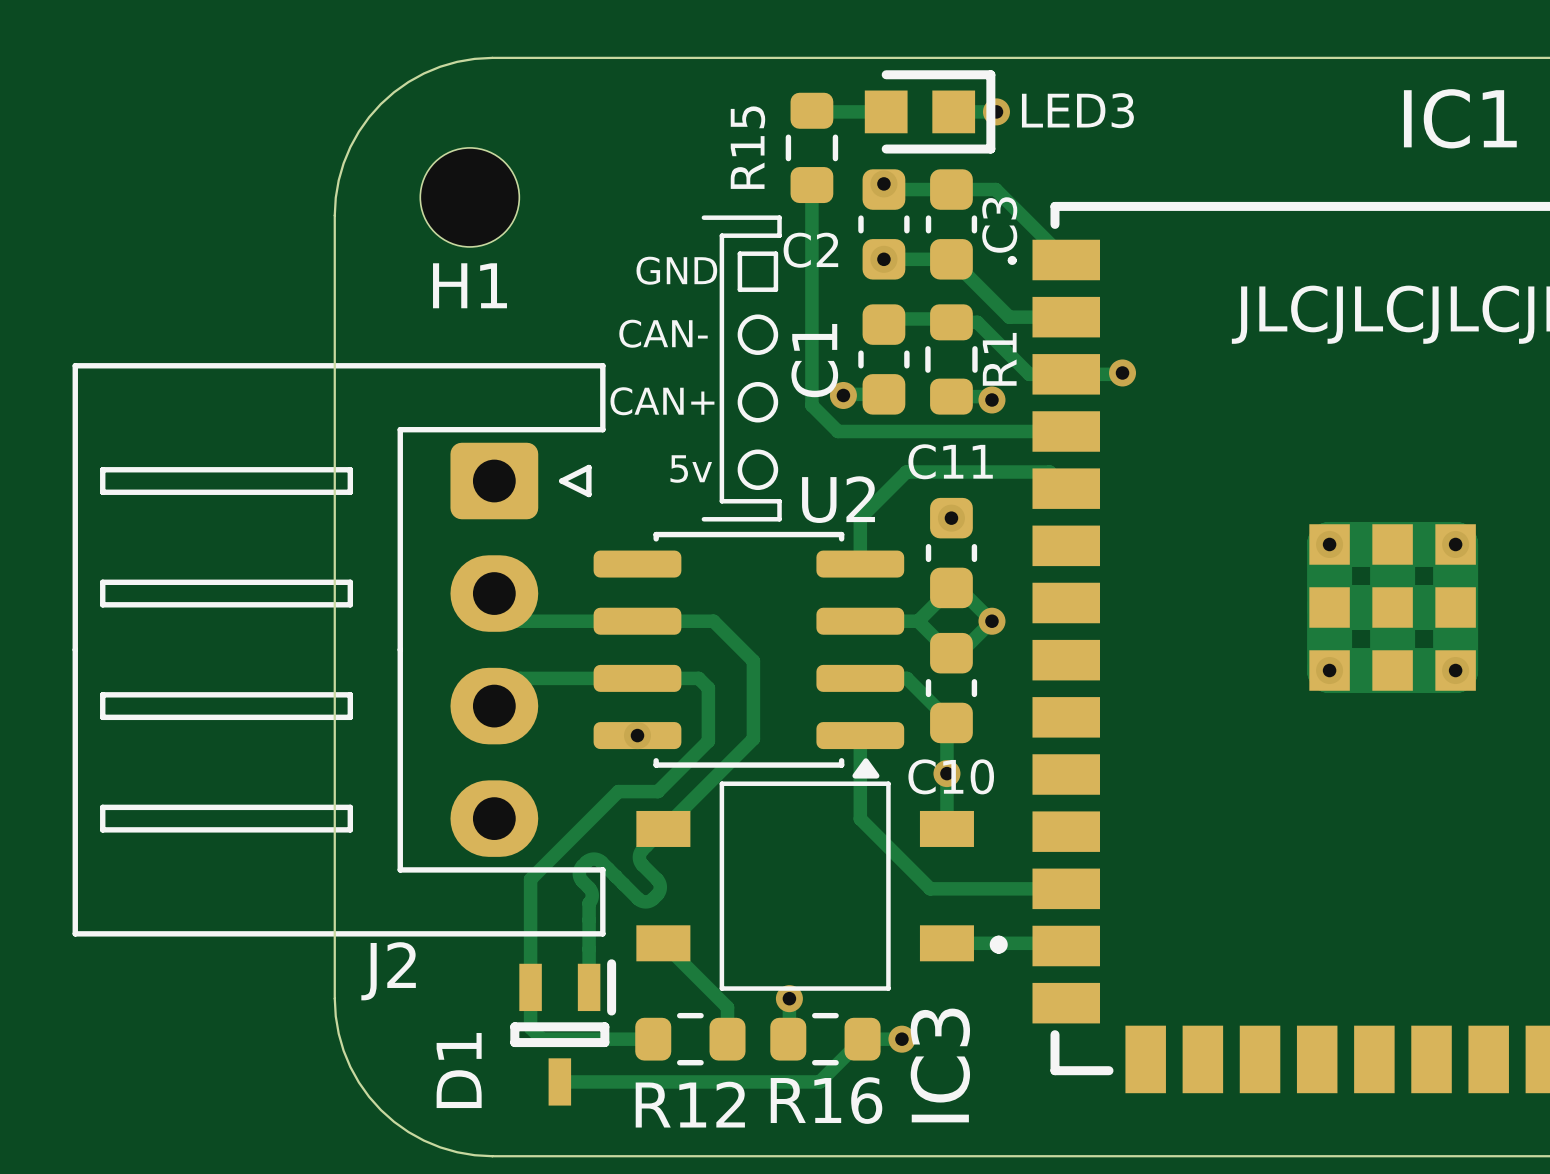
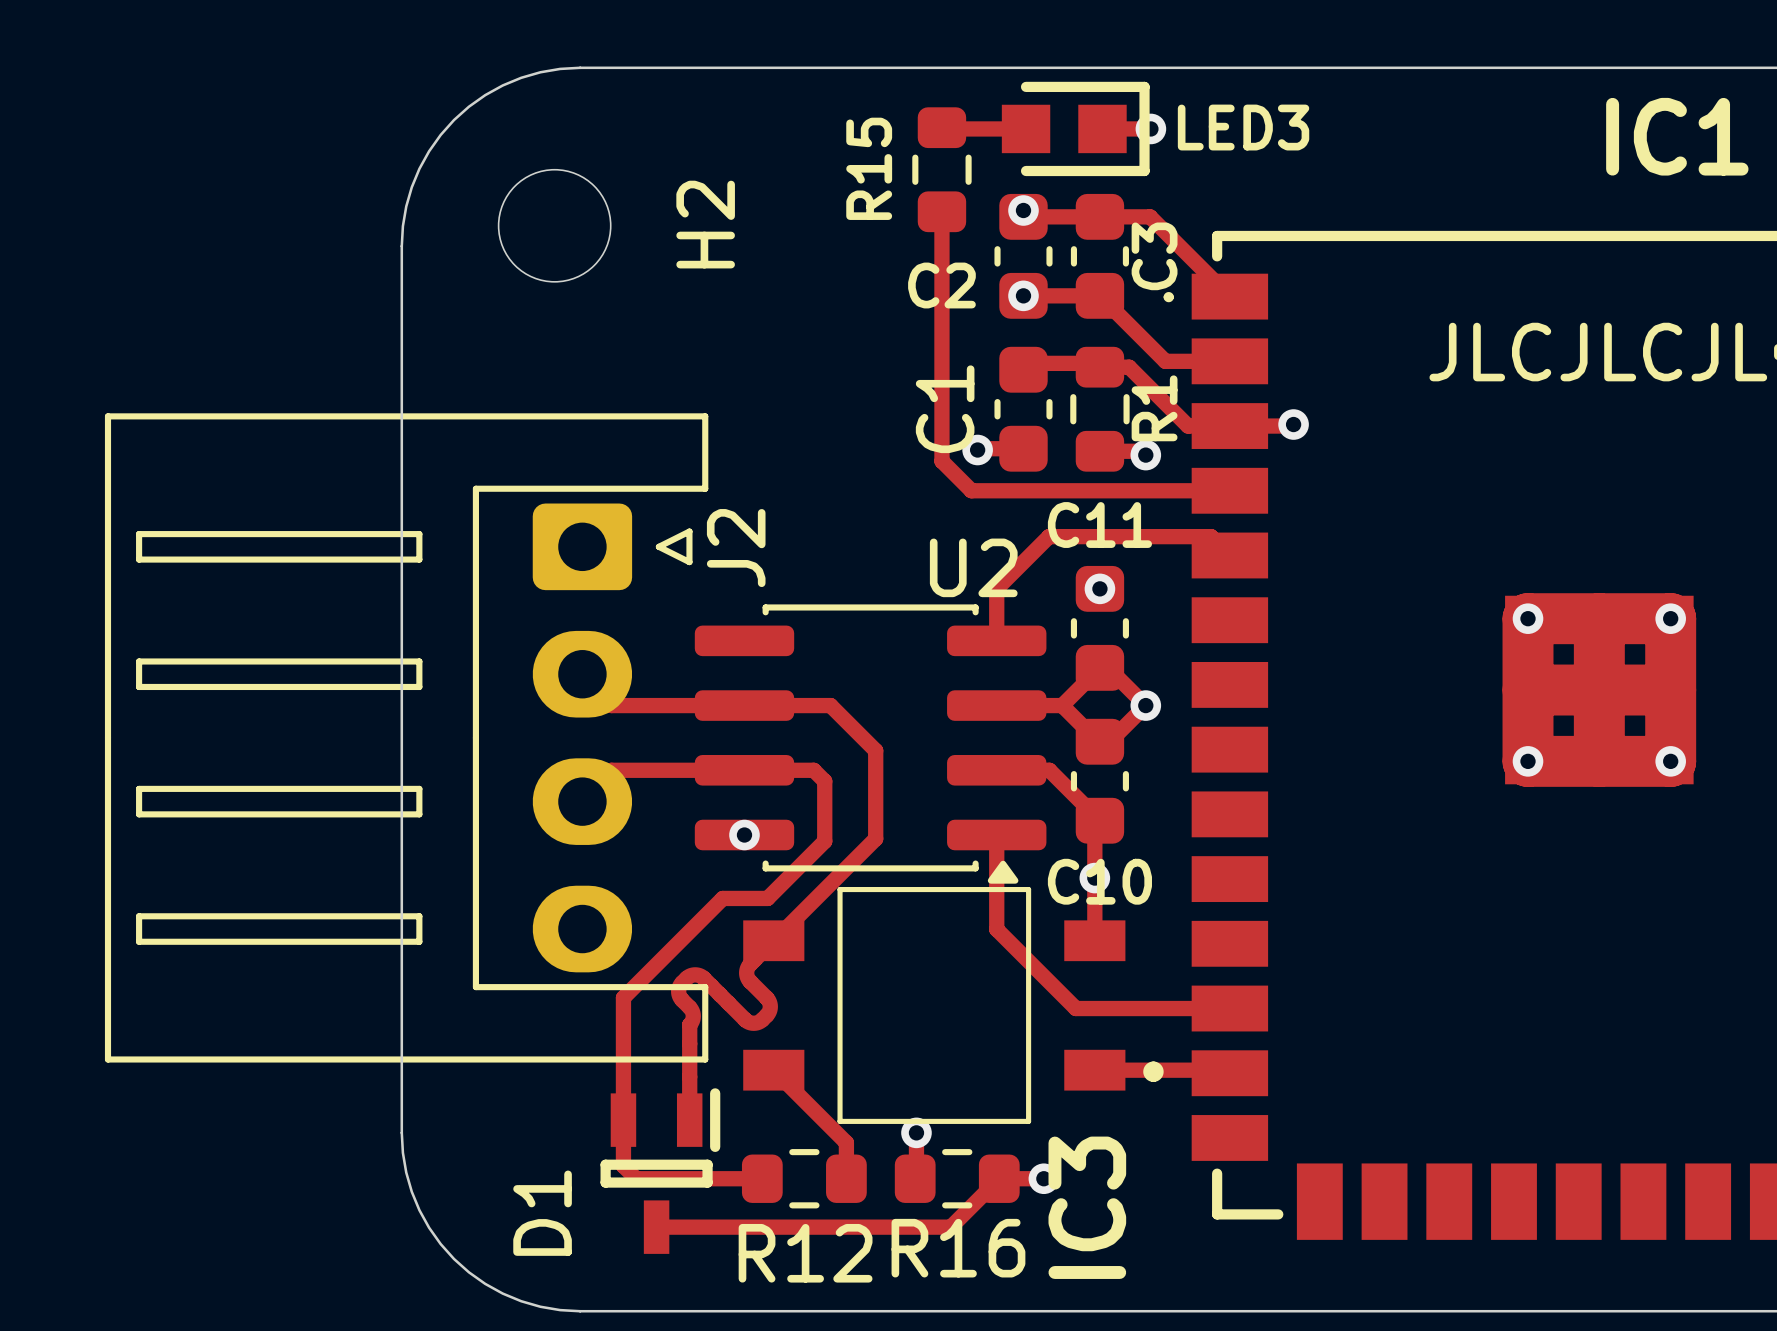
line: (703, 217) (779, 217) (779, 235) (721, 235) (721, 501) (779, 501) (779, 519) (703, 519) -> none
line: (739, 253) (775, 253) (775, 289) (739, 289) (739, 253) -> none
text: GND (676, 270) -> none
H1 name: H1 (469, 285) -> H2 (705, 224)
drawing: [737, 314, 779, 491] -> none
text: CAN- (663, 333) -> none
text: CAN+ (662, 401) -> none
text: 5v (691, 469) -> none
J2 name rotation: 0° (388, 971) -> 90° counterclockwise (736, 548)
J2 name position: J2 (388, 971) -> J2 (736, 548)

